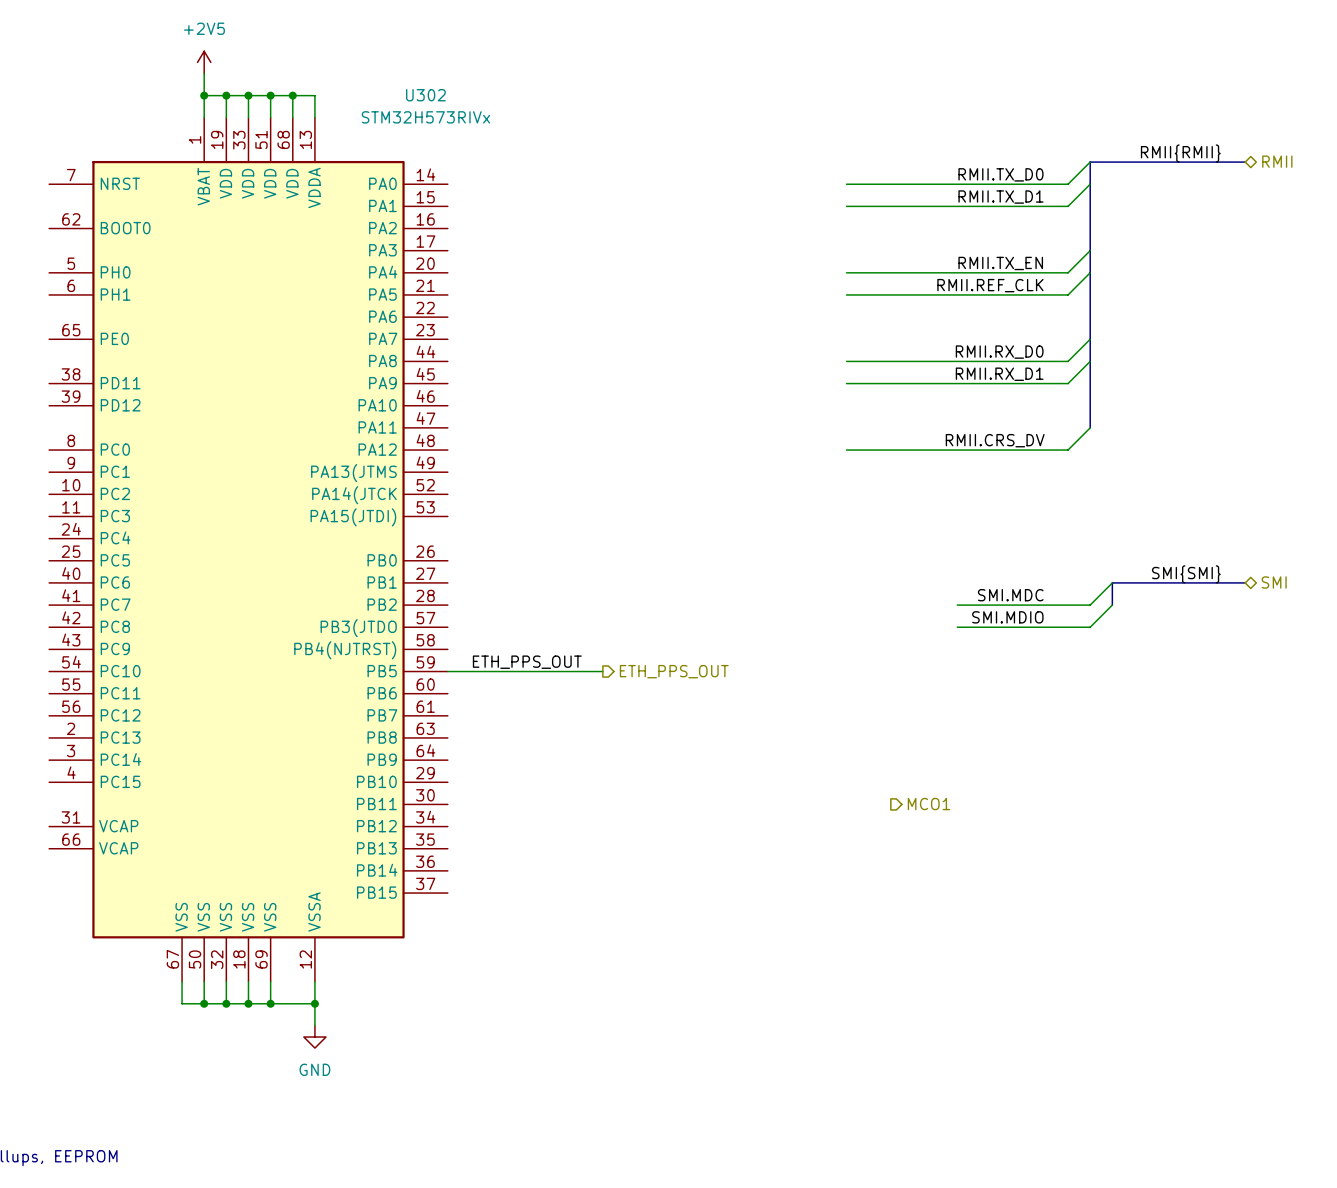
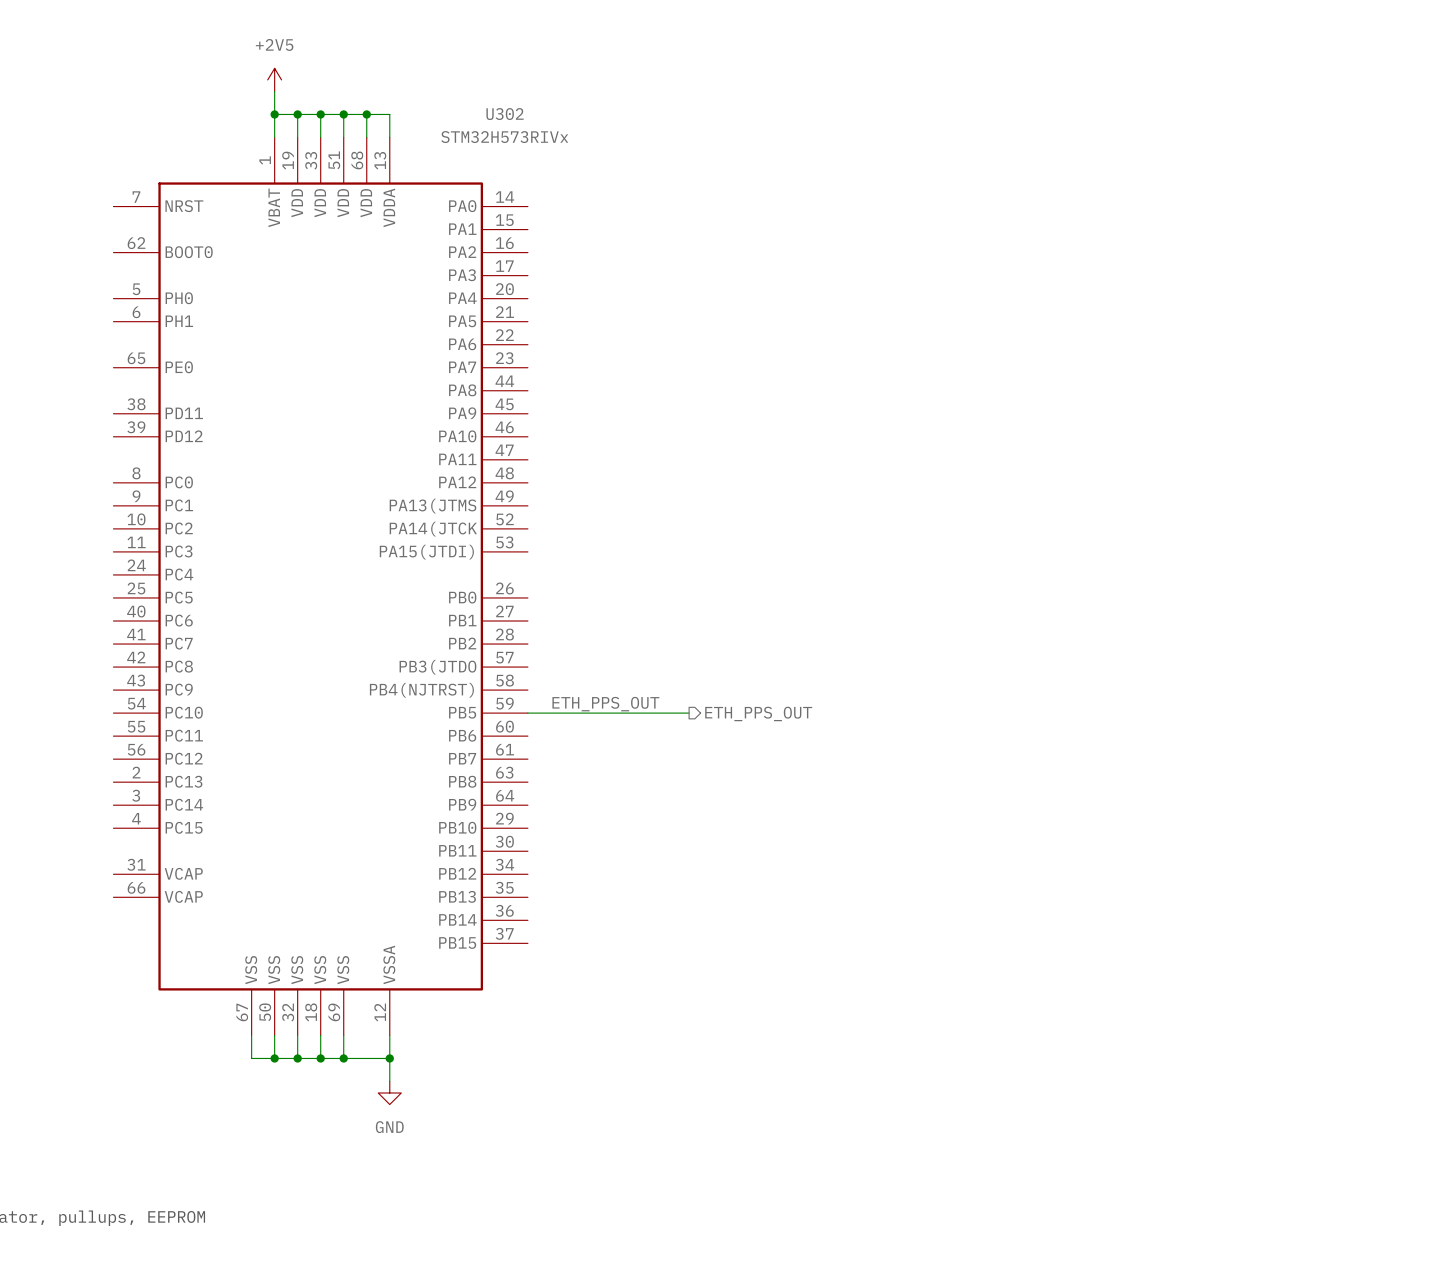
label: RMII{RMII} (1180, 153) -> none
hierarchical label: RMII (1277, 161) -> none
wire: (1090, 162) (1068, 184) (846, 184) -> none
bus: (1245, 162) (1090, 162) (1090, 427) -> none
label: RMII.TX_D0 (1000, 174) -> none
wire: (1090, 184) (1068, 206) (846, 206) -> none
label: RMII.TX_D1 (1000, 197) -> none
wire: (1090, 250) (1068, 272) (846, 272) -> none
label: RMII.TX_EN (1000, 263) -> none
wire: (1090, 272) (1068, 294) (846, 294) -> none
label: RMII.REF_CLK (990, 285) -> none
wire: (1090, 339) (1068, 361) (846, 361) -> none
label: RMII.RX_D0 (999, 352) -> none
wire: (1090, 361) (1068, 383) (846, 383) -> none
label: RMII.RX_D1 (999, 374) -> none
wire: (1090, 427) (1068, 450) (846, 450) -> none
label: RMII.CRS_DV (995, 440) -> none
label: SMI{SMI} (1186, 574) -> none
wire: (1112, 582) (1090, 605) (957, 605) -> none
bus: (1245, 582) (1112, 582) (1112, 605) -> none
hierarchical label: SMI (1274, 582) -> none
label: SMI.MDC (1010, 595) -> none
wire: (1112, 605) (1090, 627) (957, 627) -> none
label: SMI.MDIO (1007, 617) -> none
hierarchical label: MCO1 (928, 804) -> none

